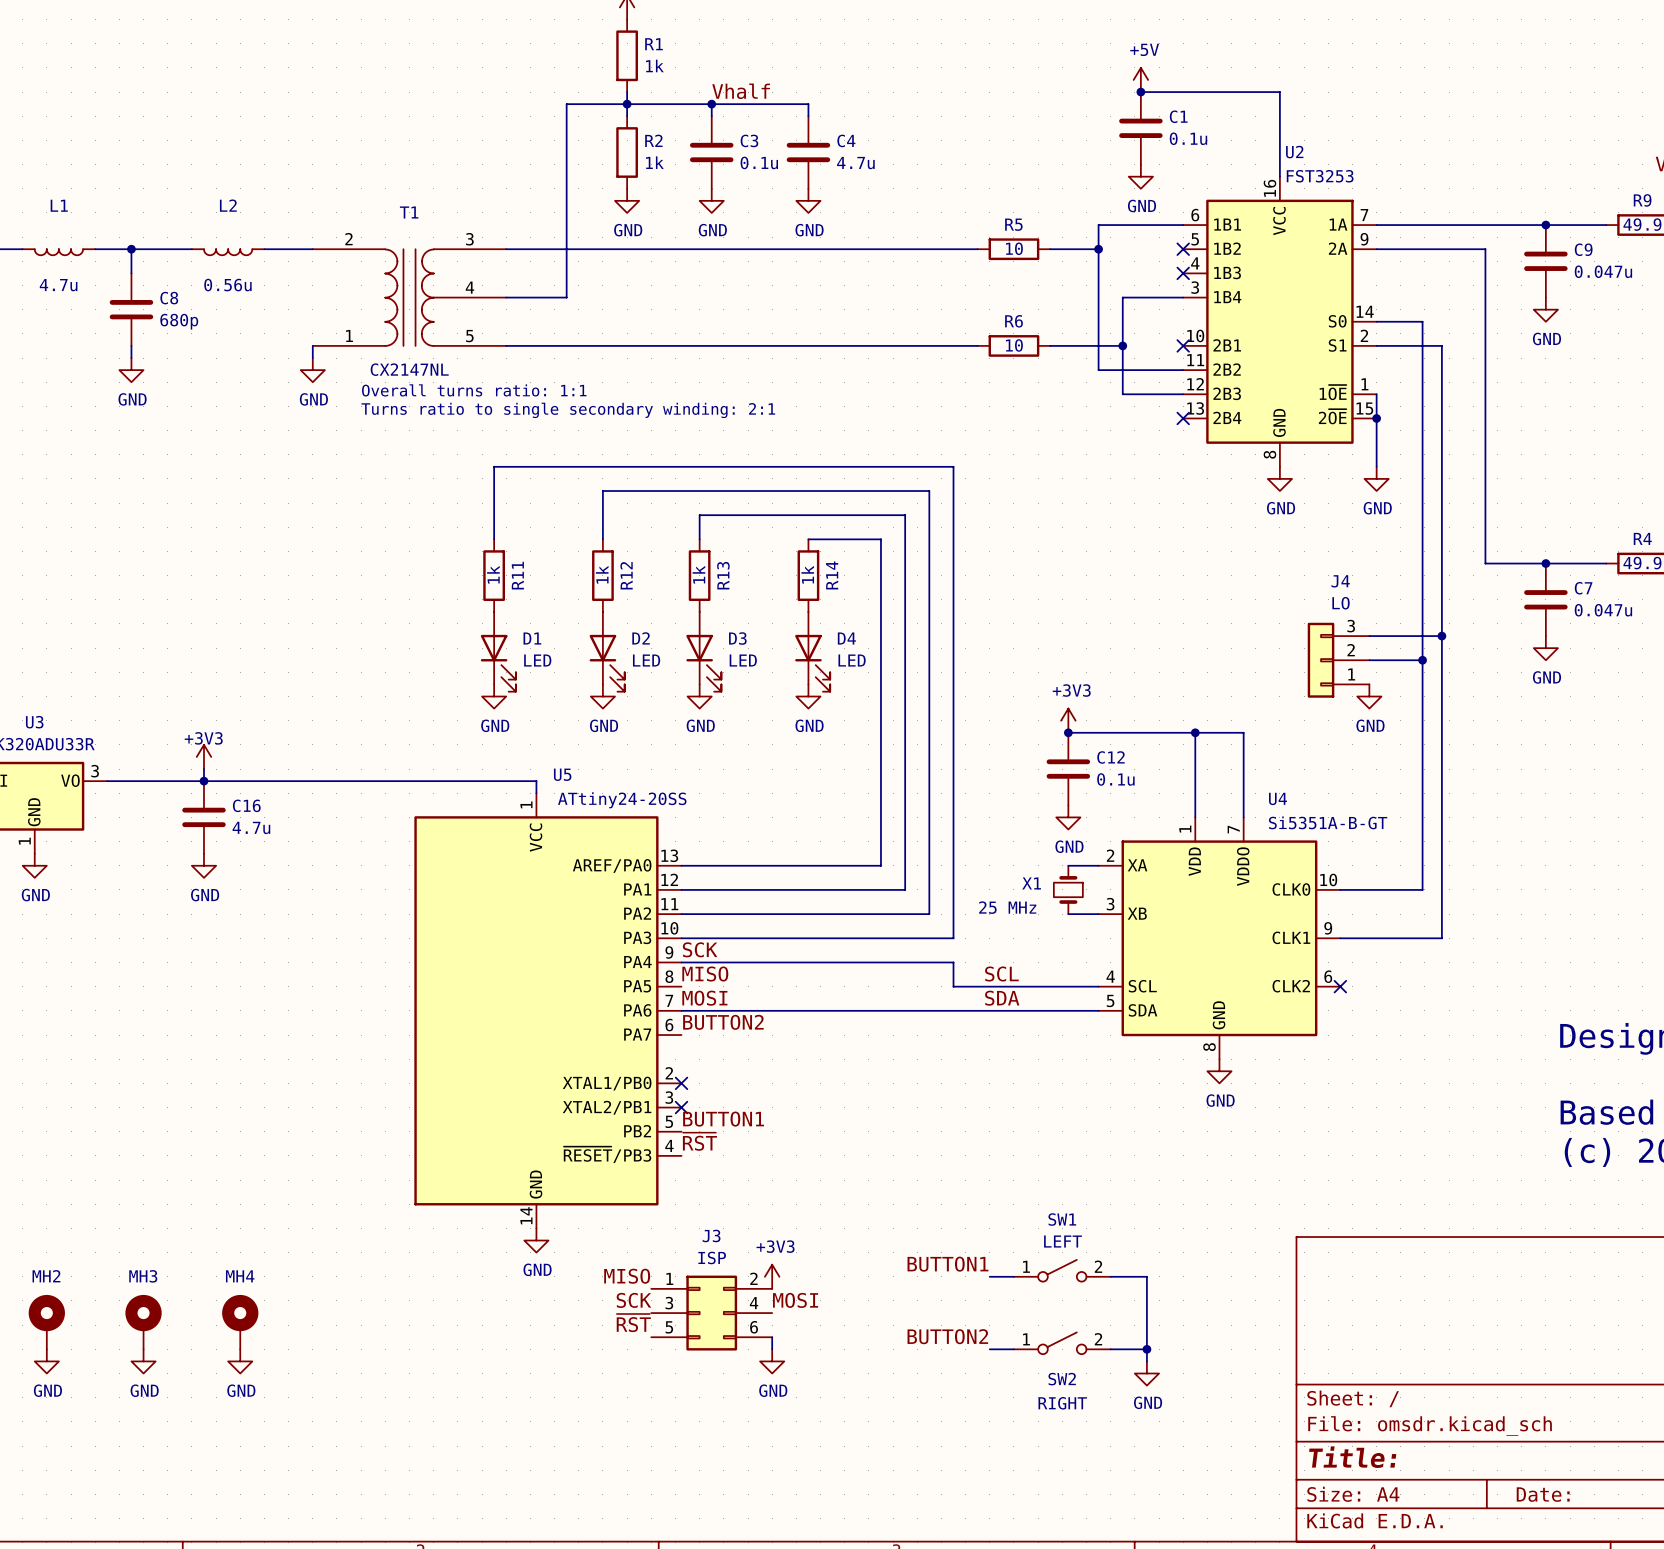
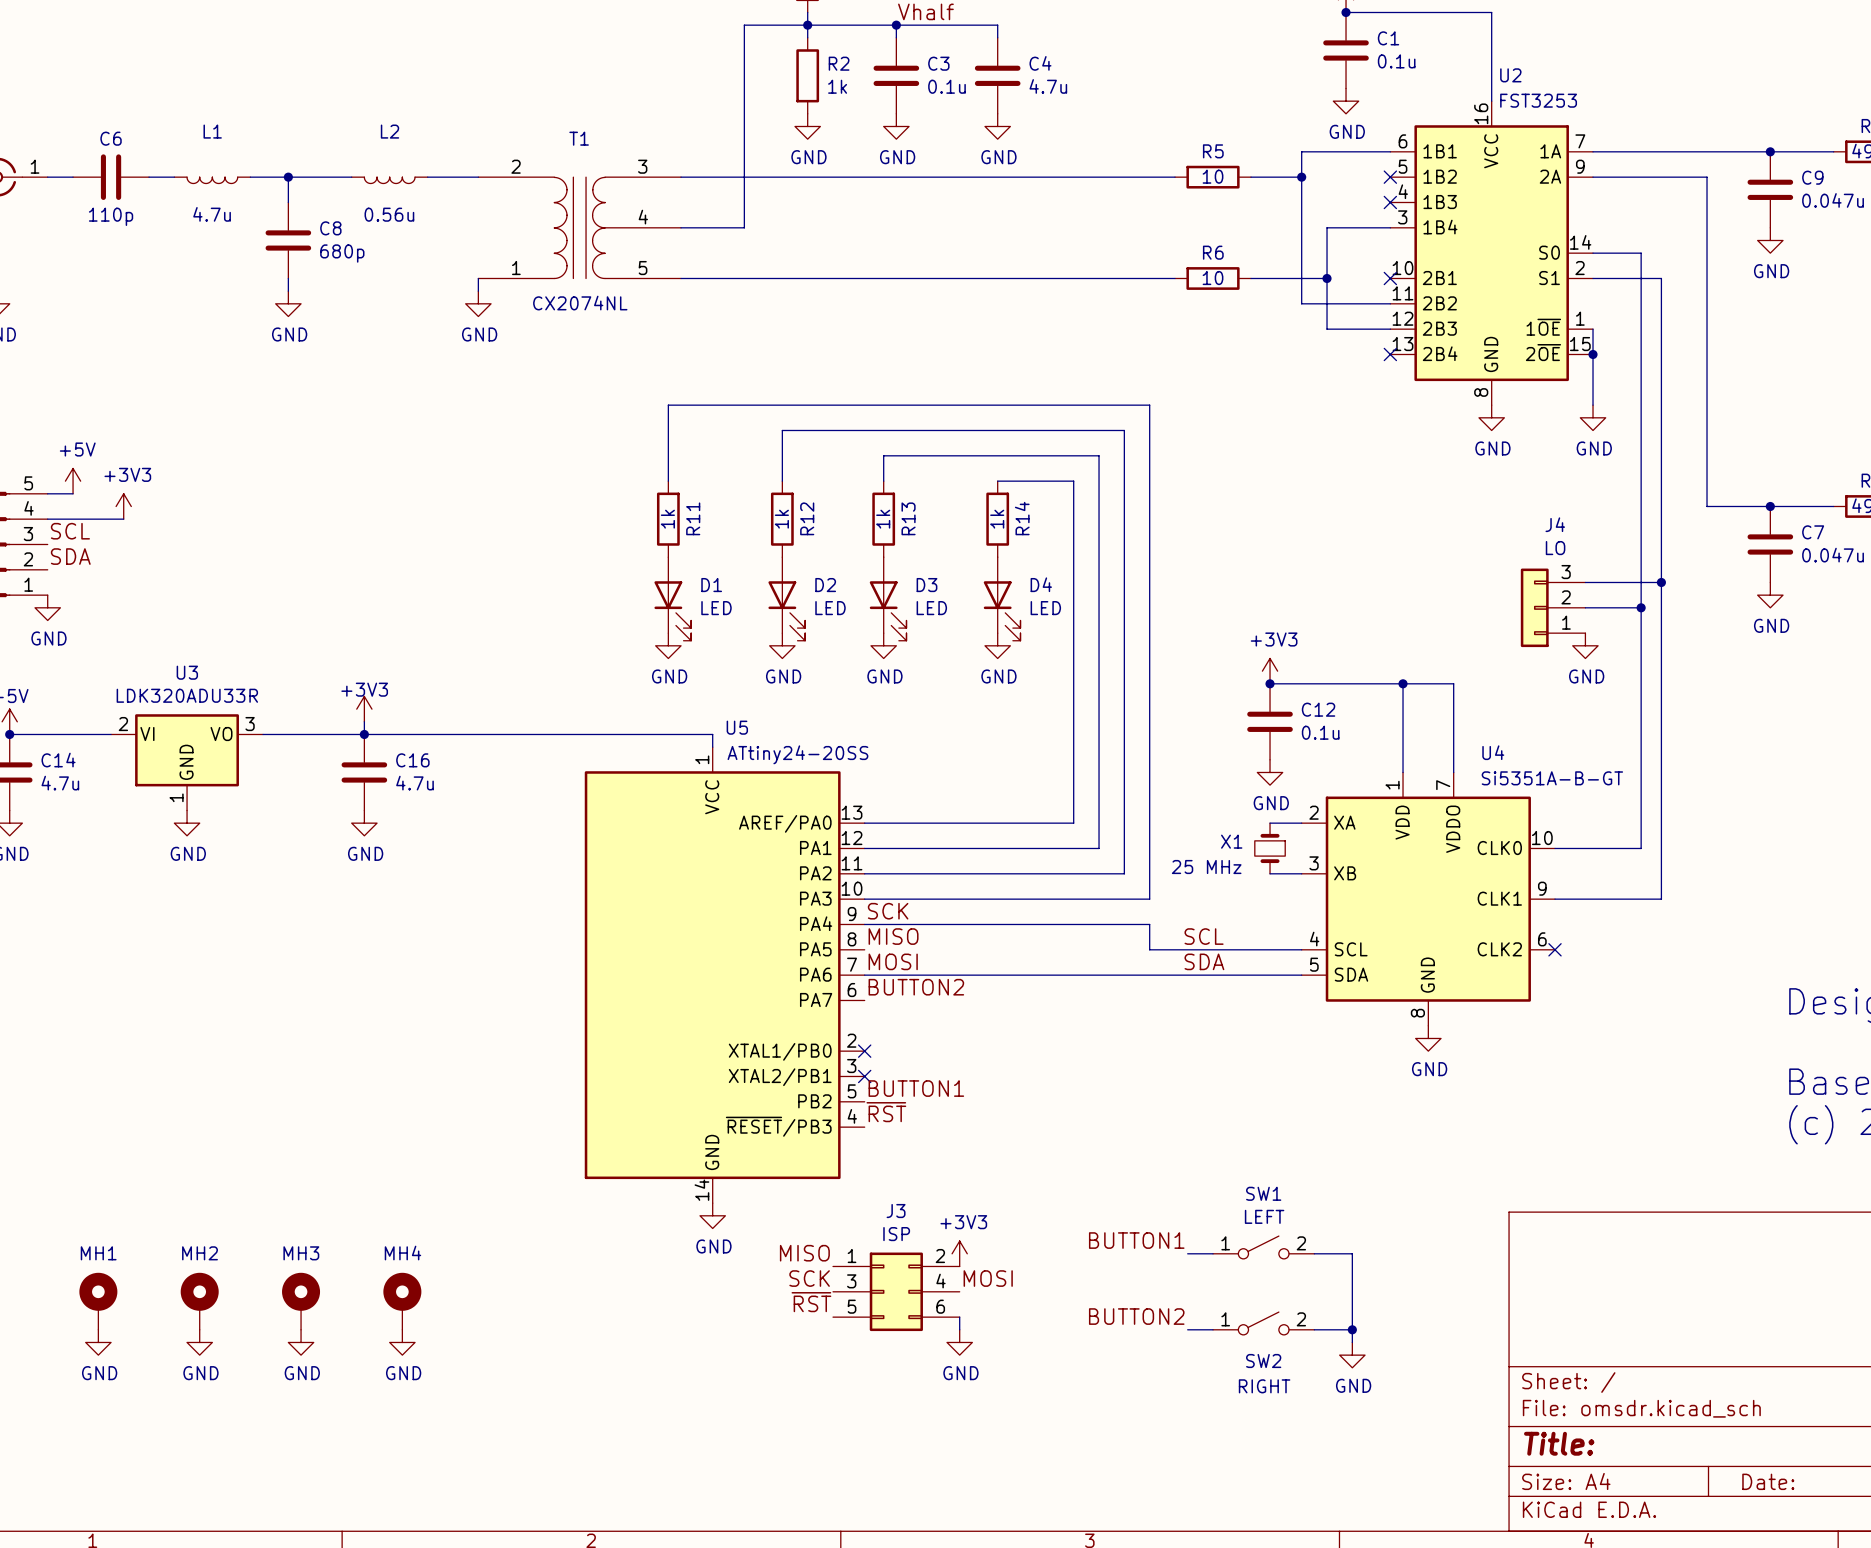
T1 value: CX2147NL (409, 369) -> CX2074NL (580, 303)
text: Overall turns ratio: 1:1 (474, 390) -> none
text: Turns ratio to single secondary winding: 2:1 (568, 410) -> none

